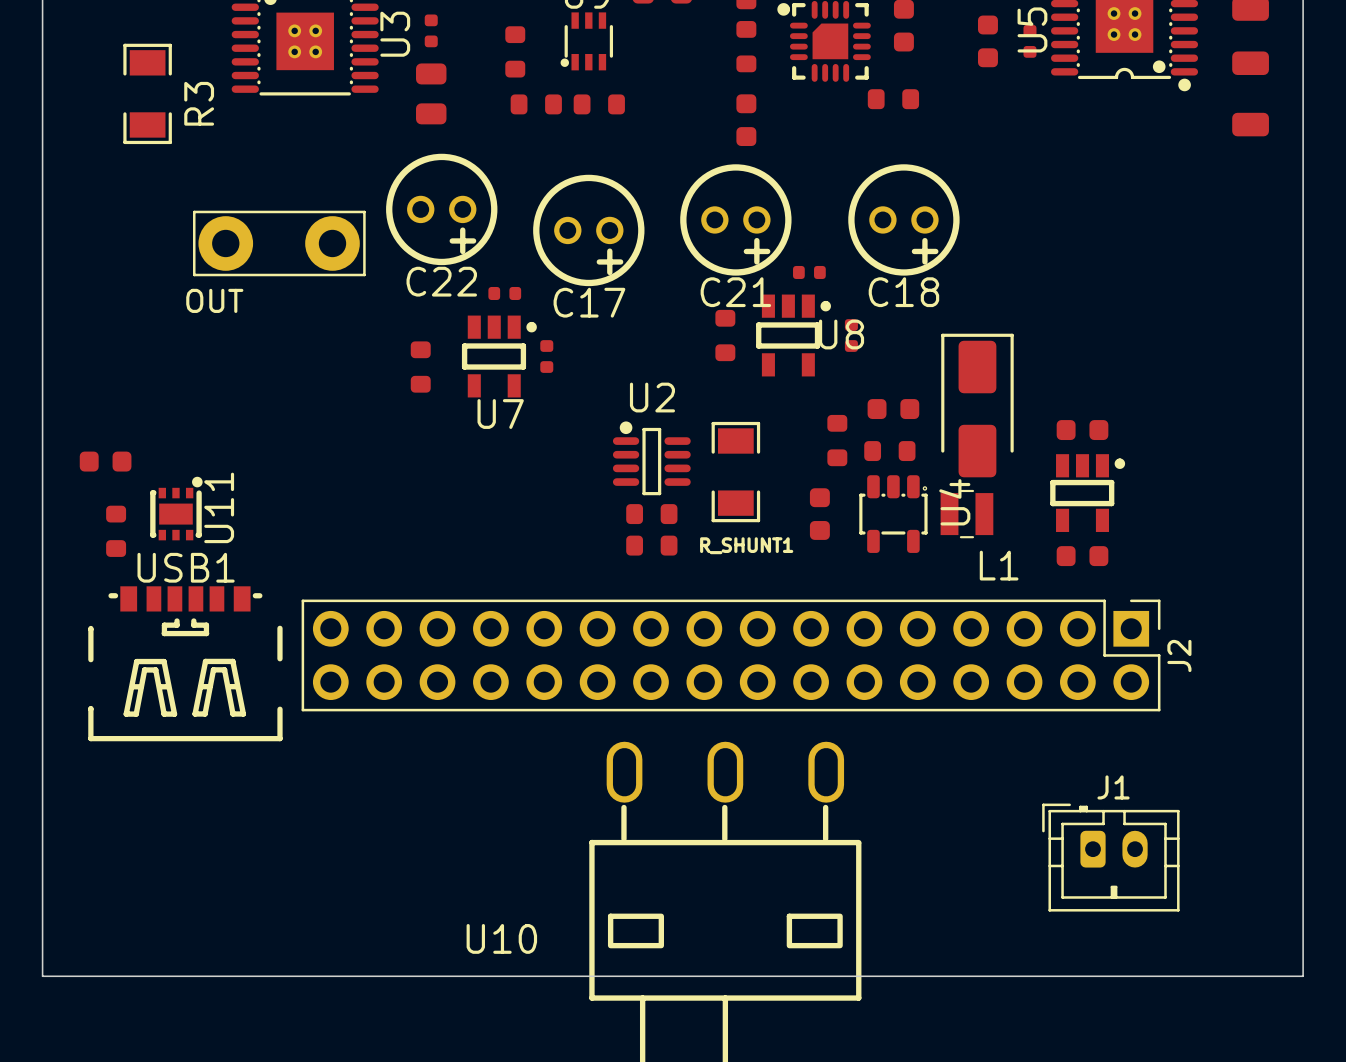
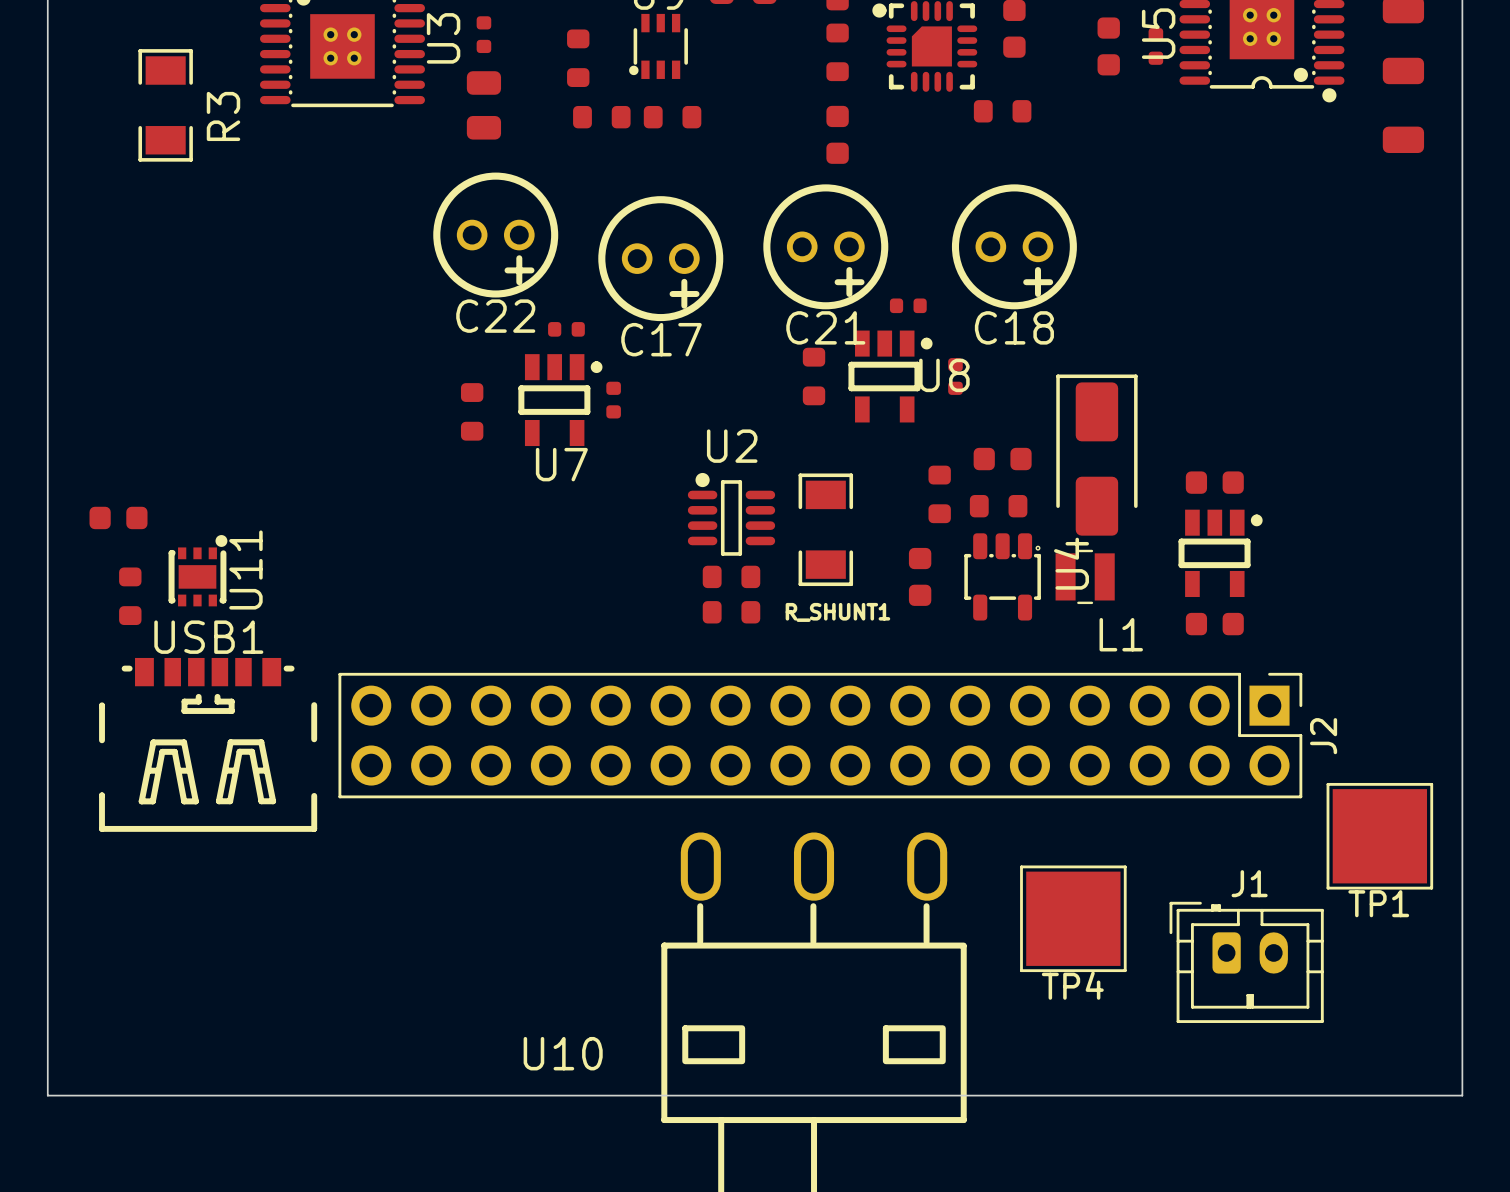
OUT: (279, 243) -> none
TP1: none -> (1379, 836)
TP4: none -> (1073, 918)

